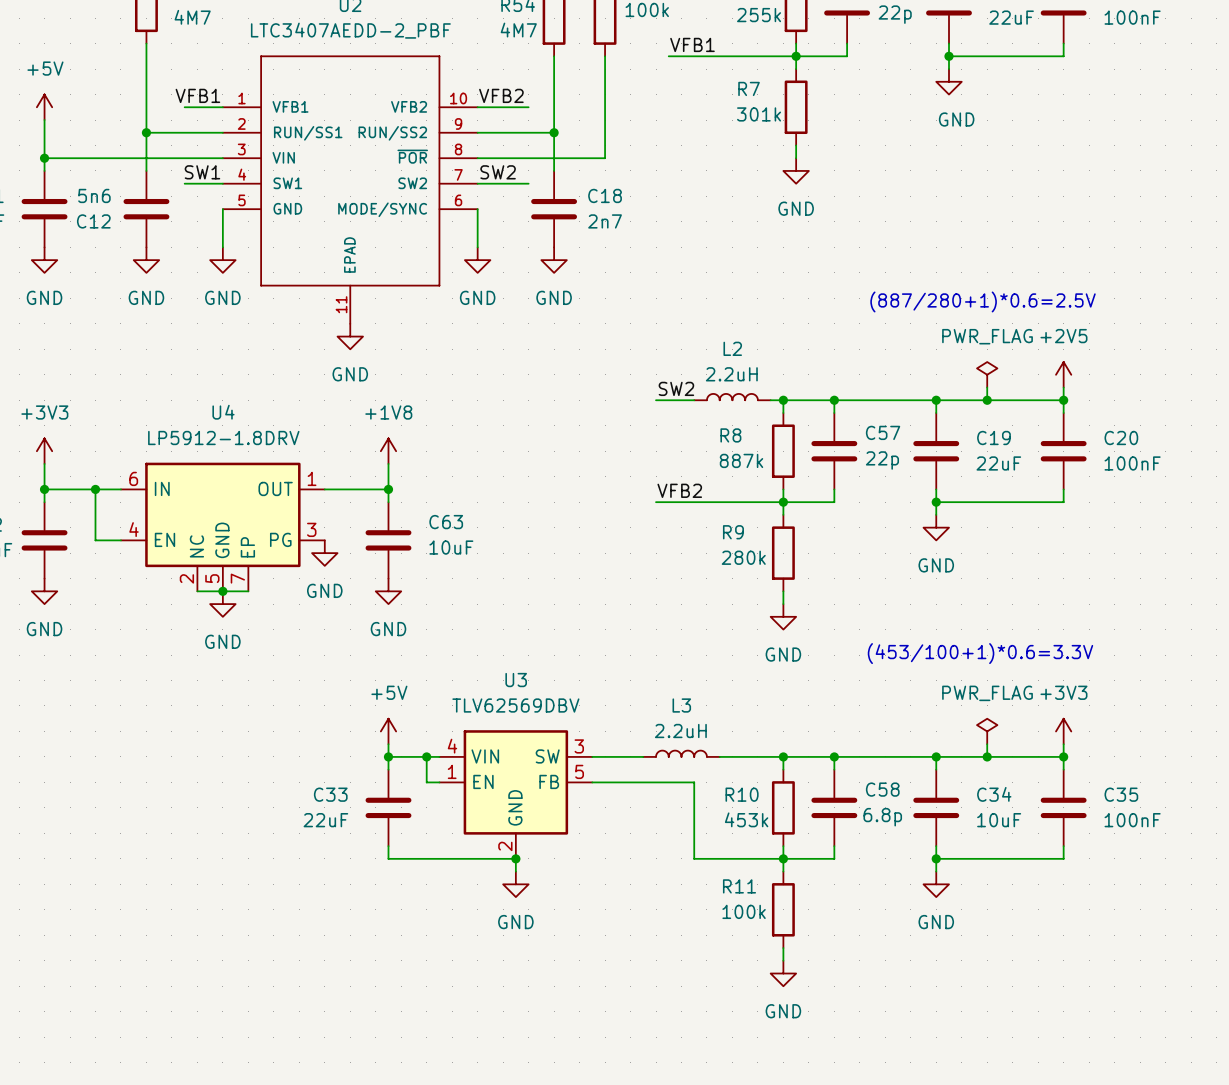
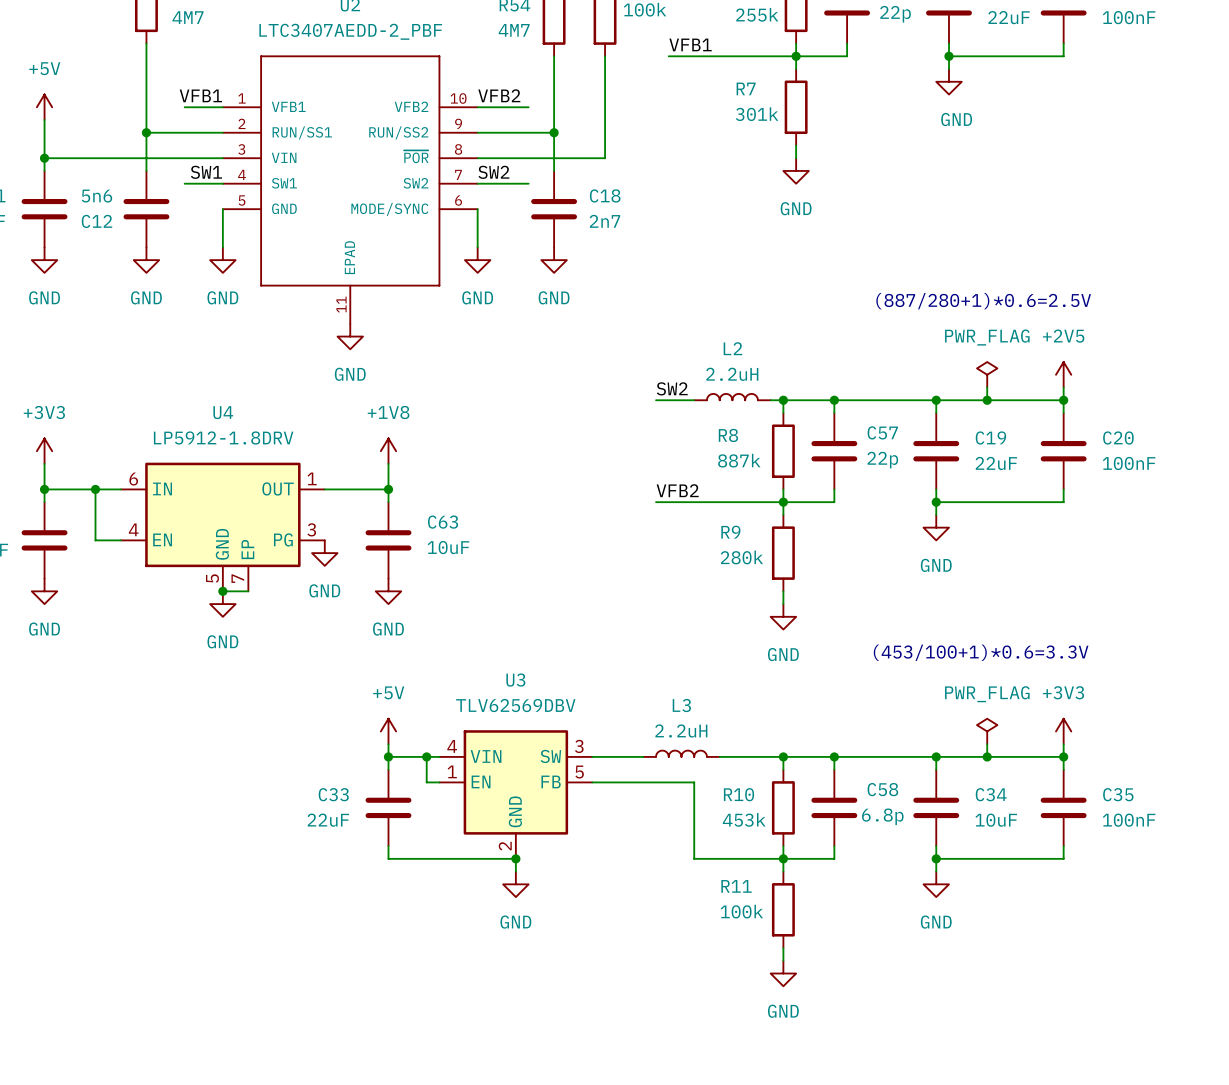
U4 symbol: [120, 462, 325, 592] -> [120, 462, 325, 592]
wire: (197, 591) (222, 591) -> none

